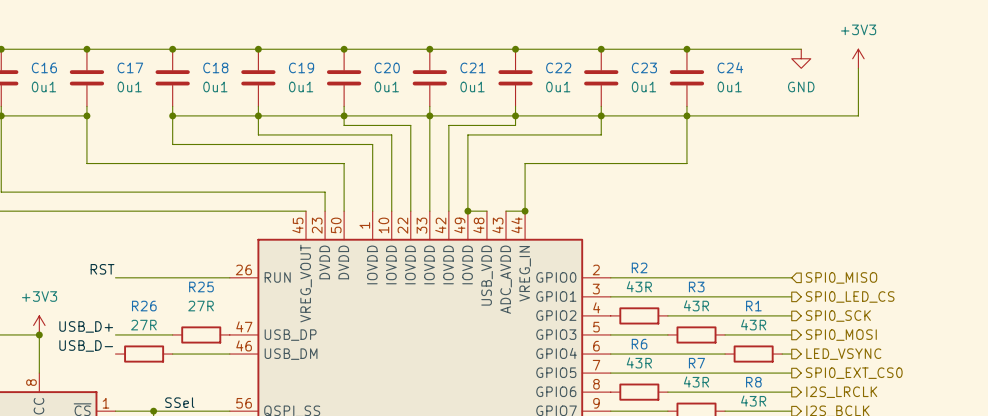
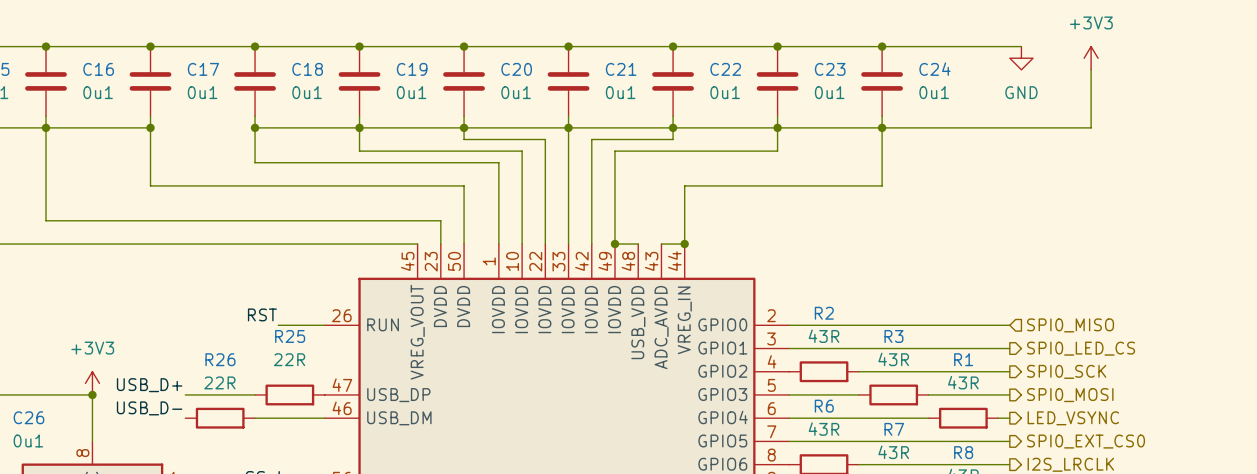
label position: RST (102, 269) -> RST (262, 314)
wire: (115, 277) (191, 277) -> none
R25 value: 27R (201, 306) -> 22R (289, 359)
R26 value: 27R (143, 325) -> 22R (219, 382)

